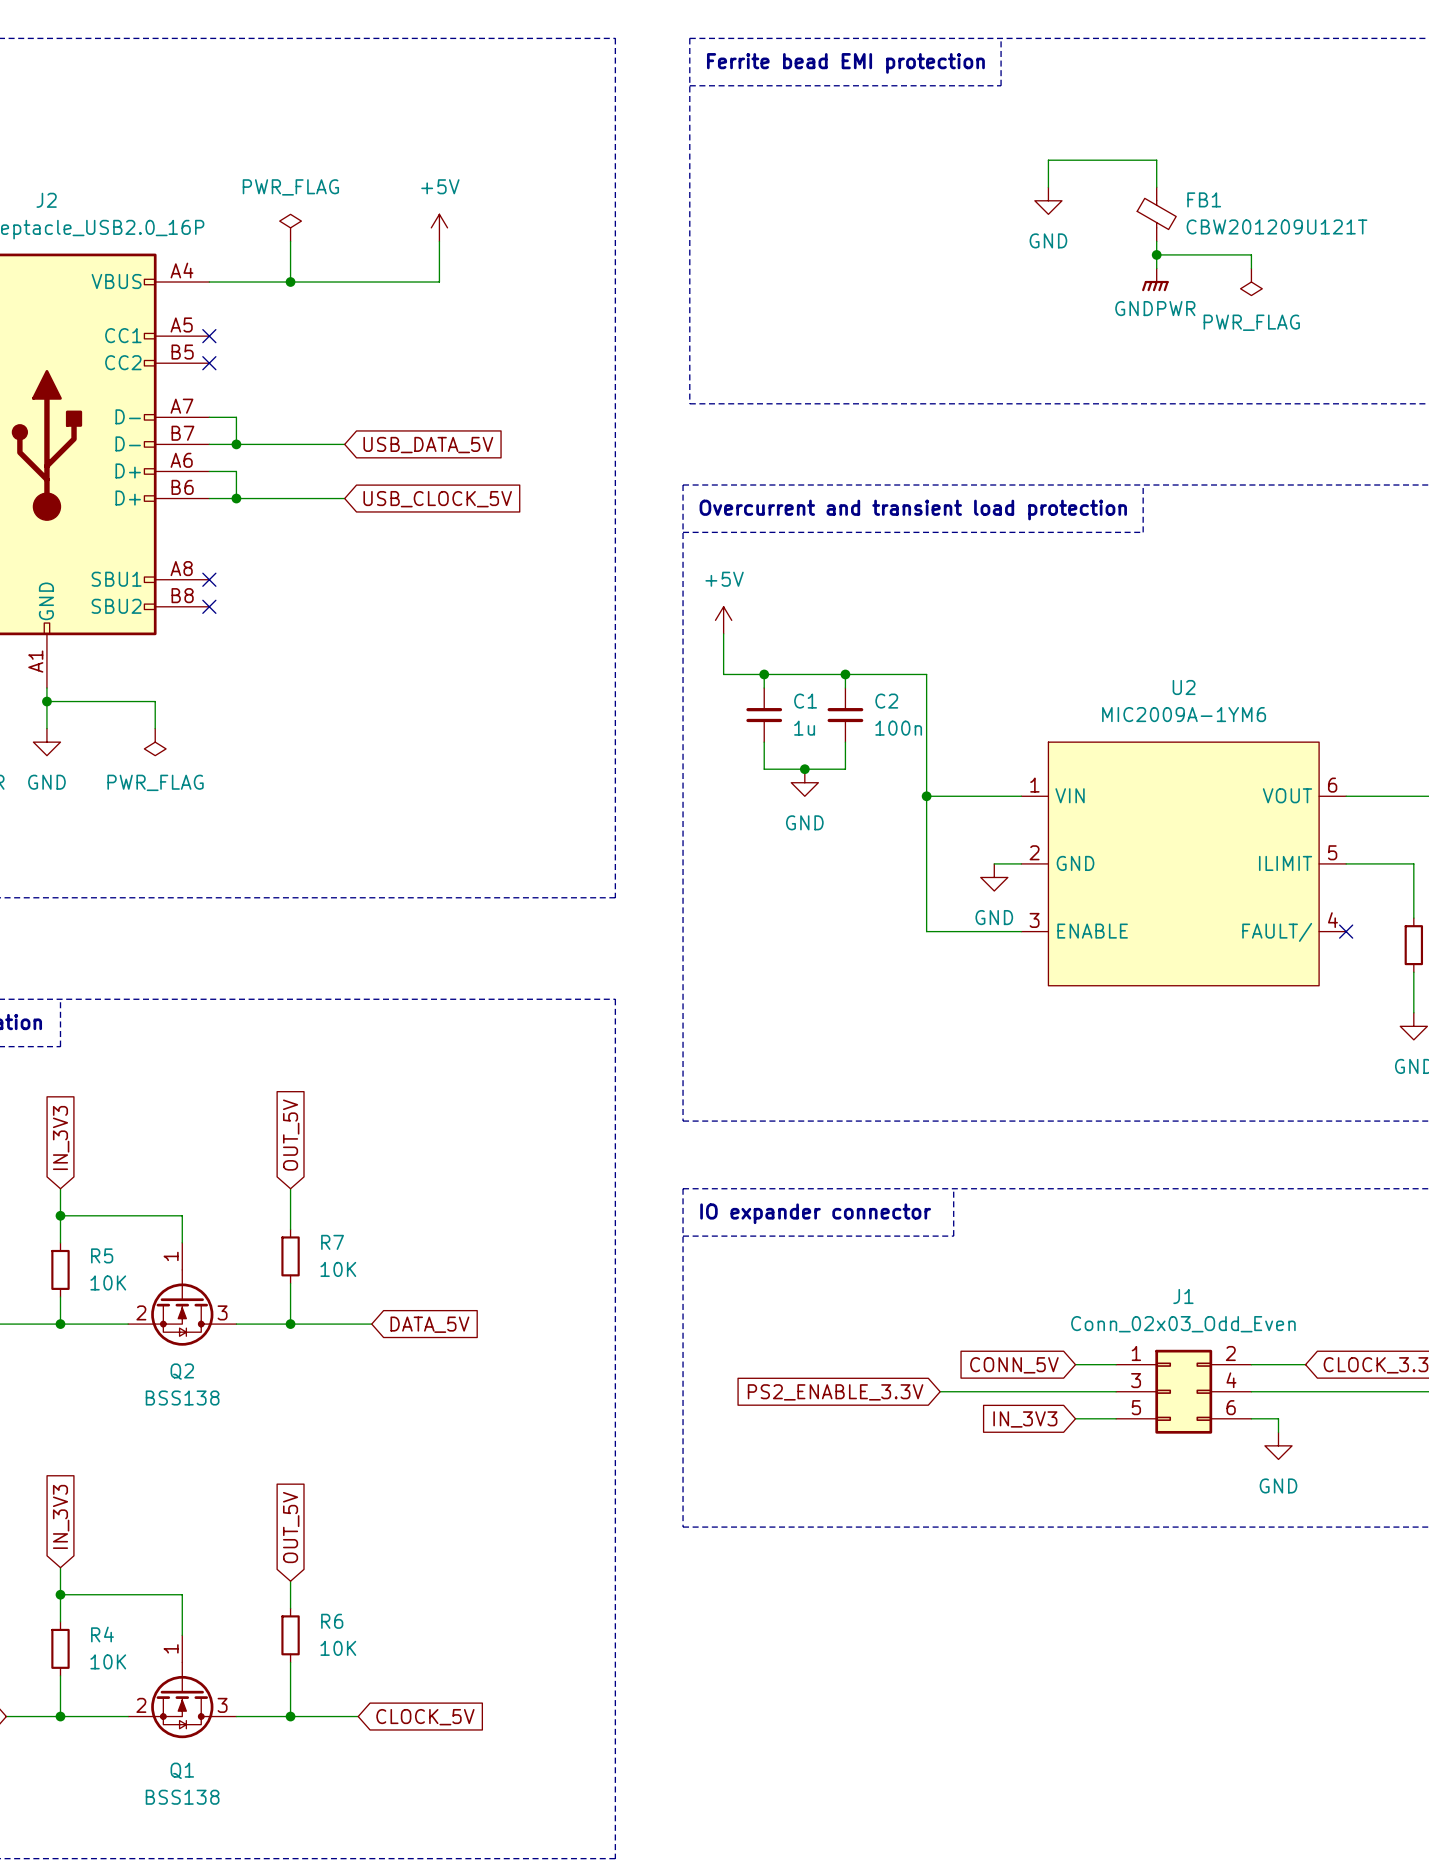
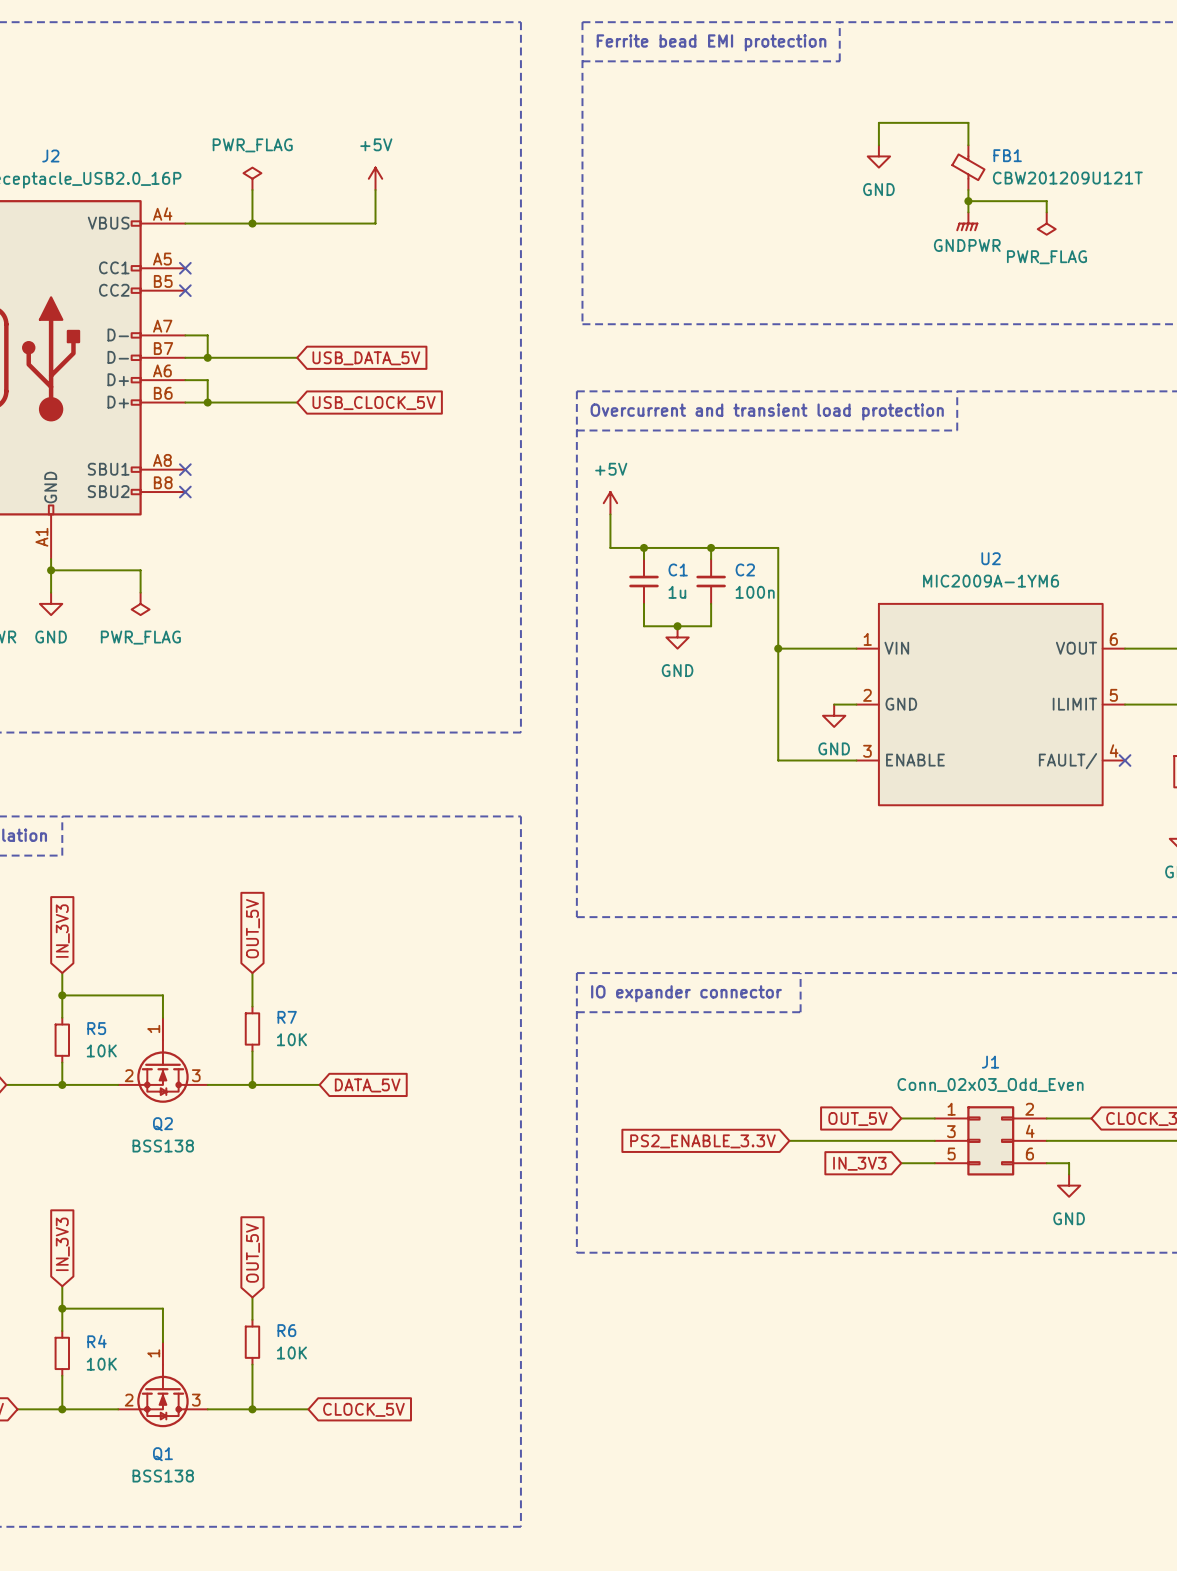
global label: CONN_5V (1014, 1365) -> OUT_5V (857, 1119)

